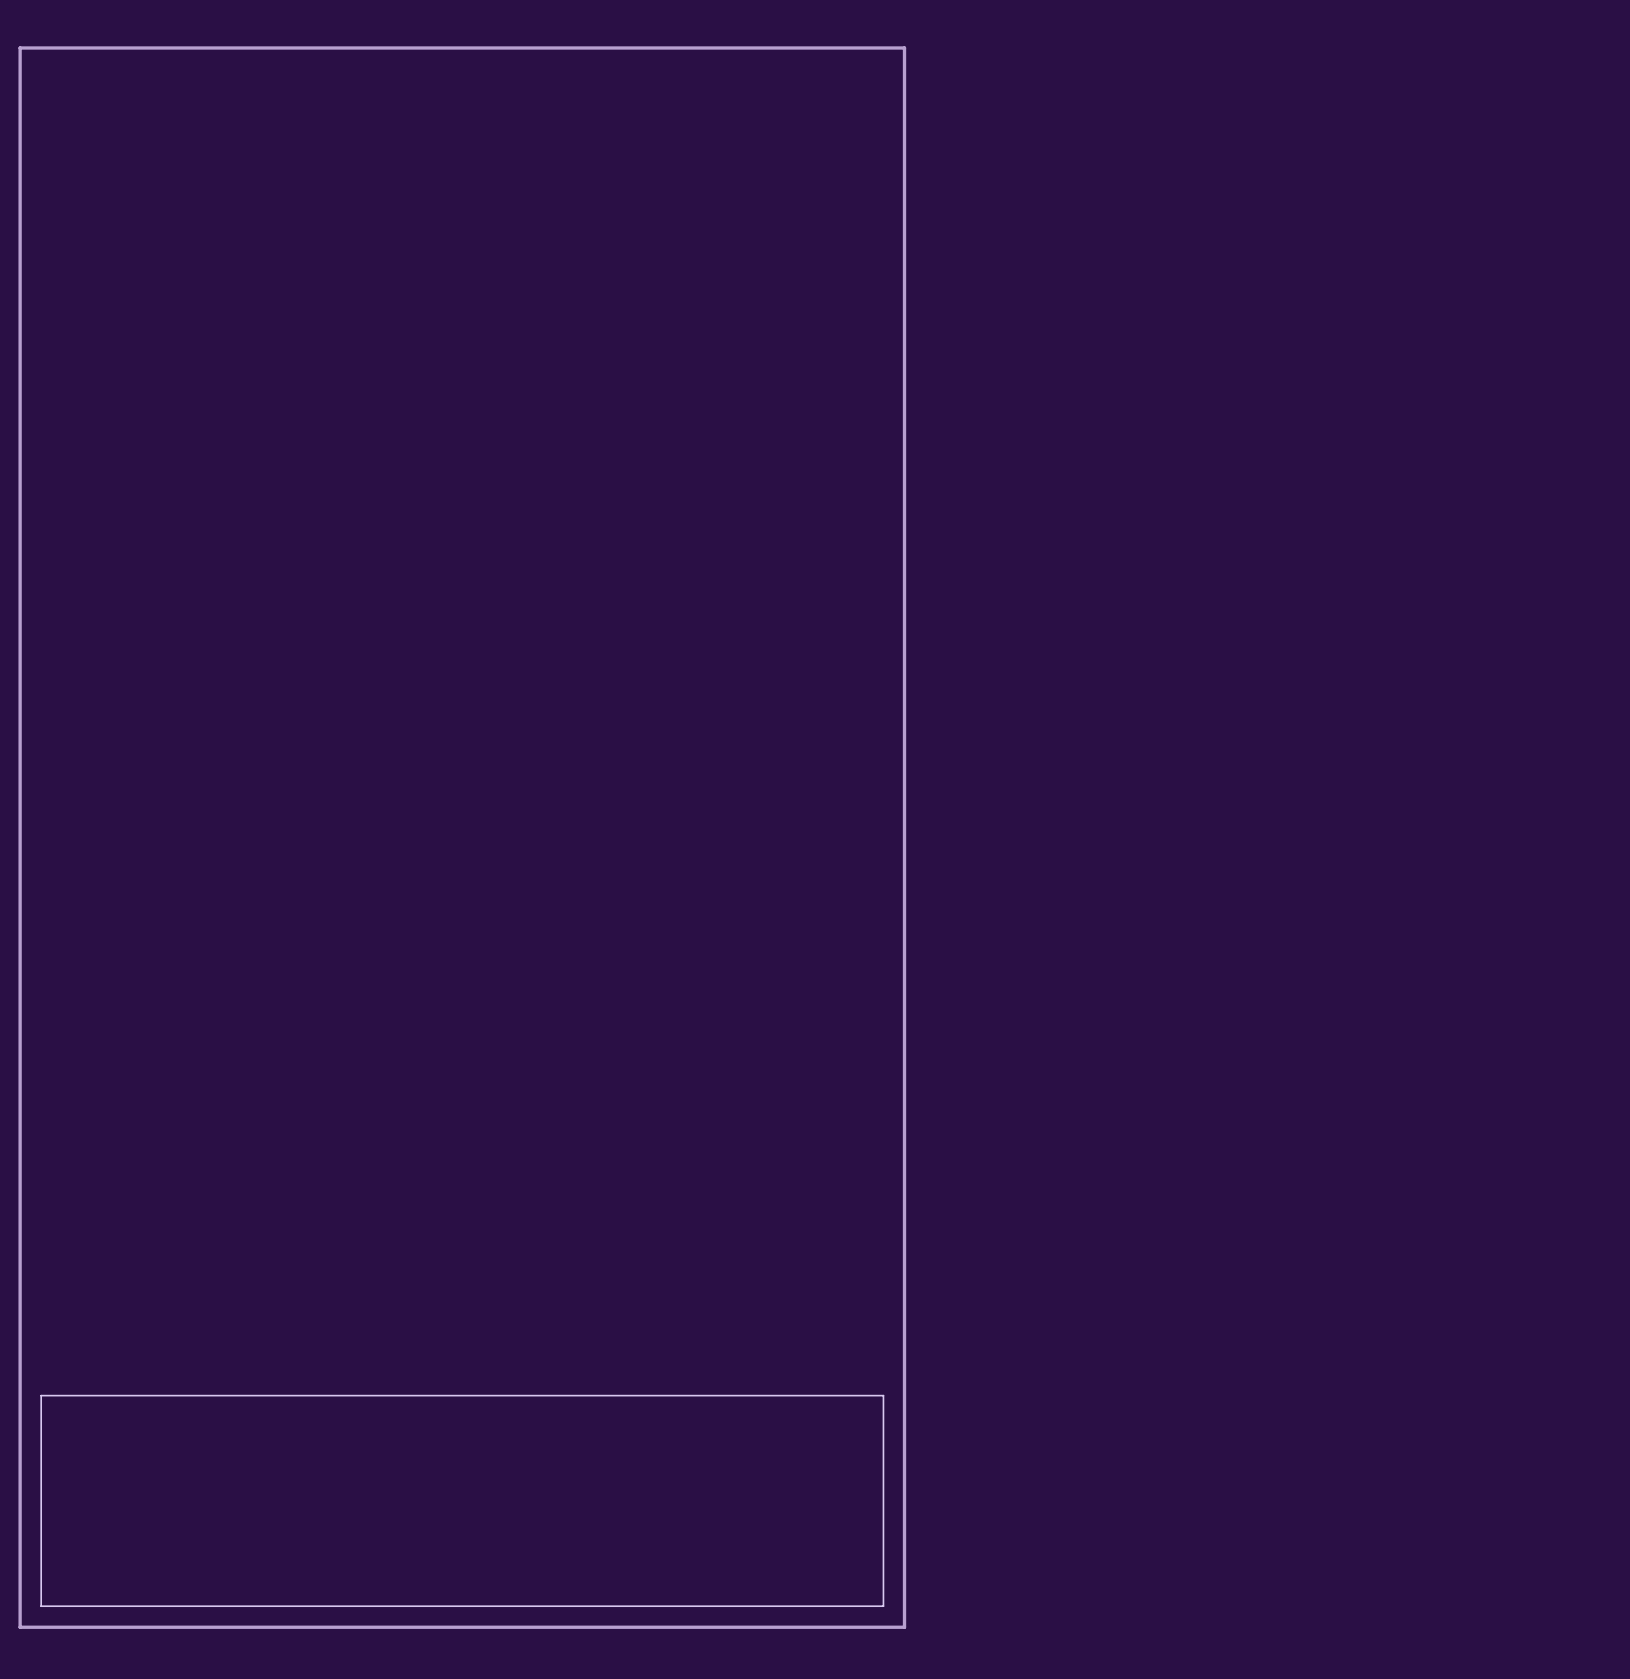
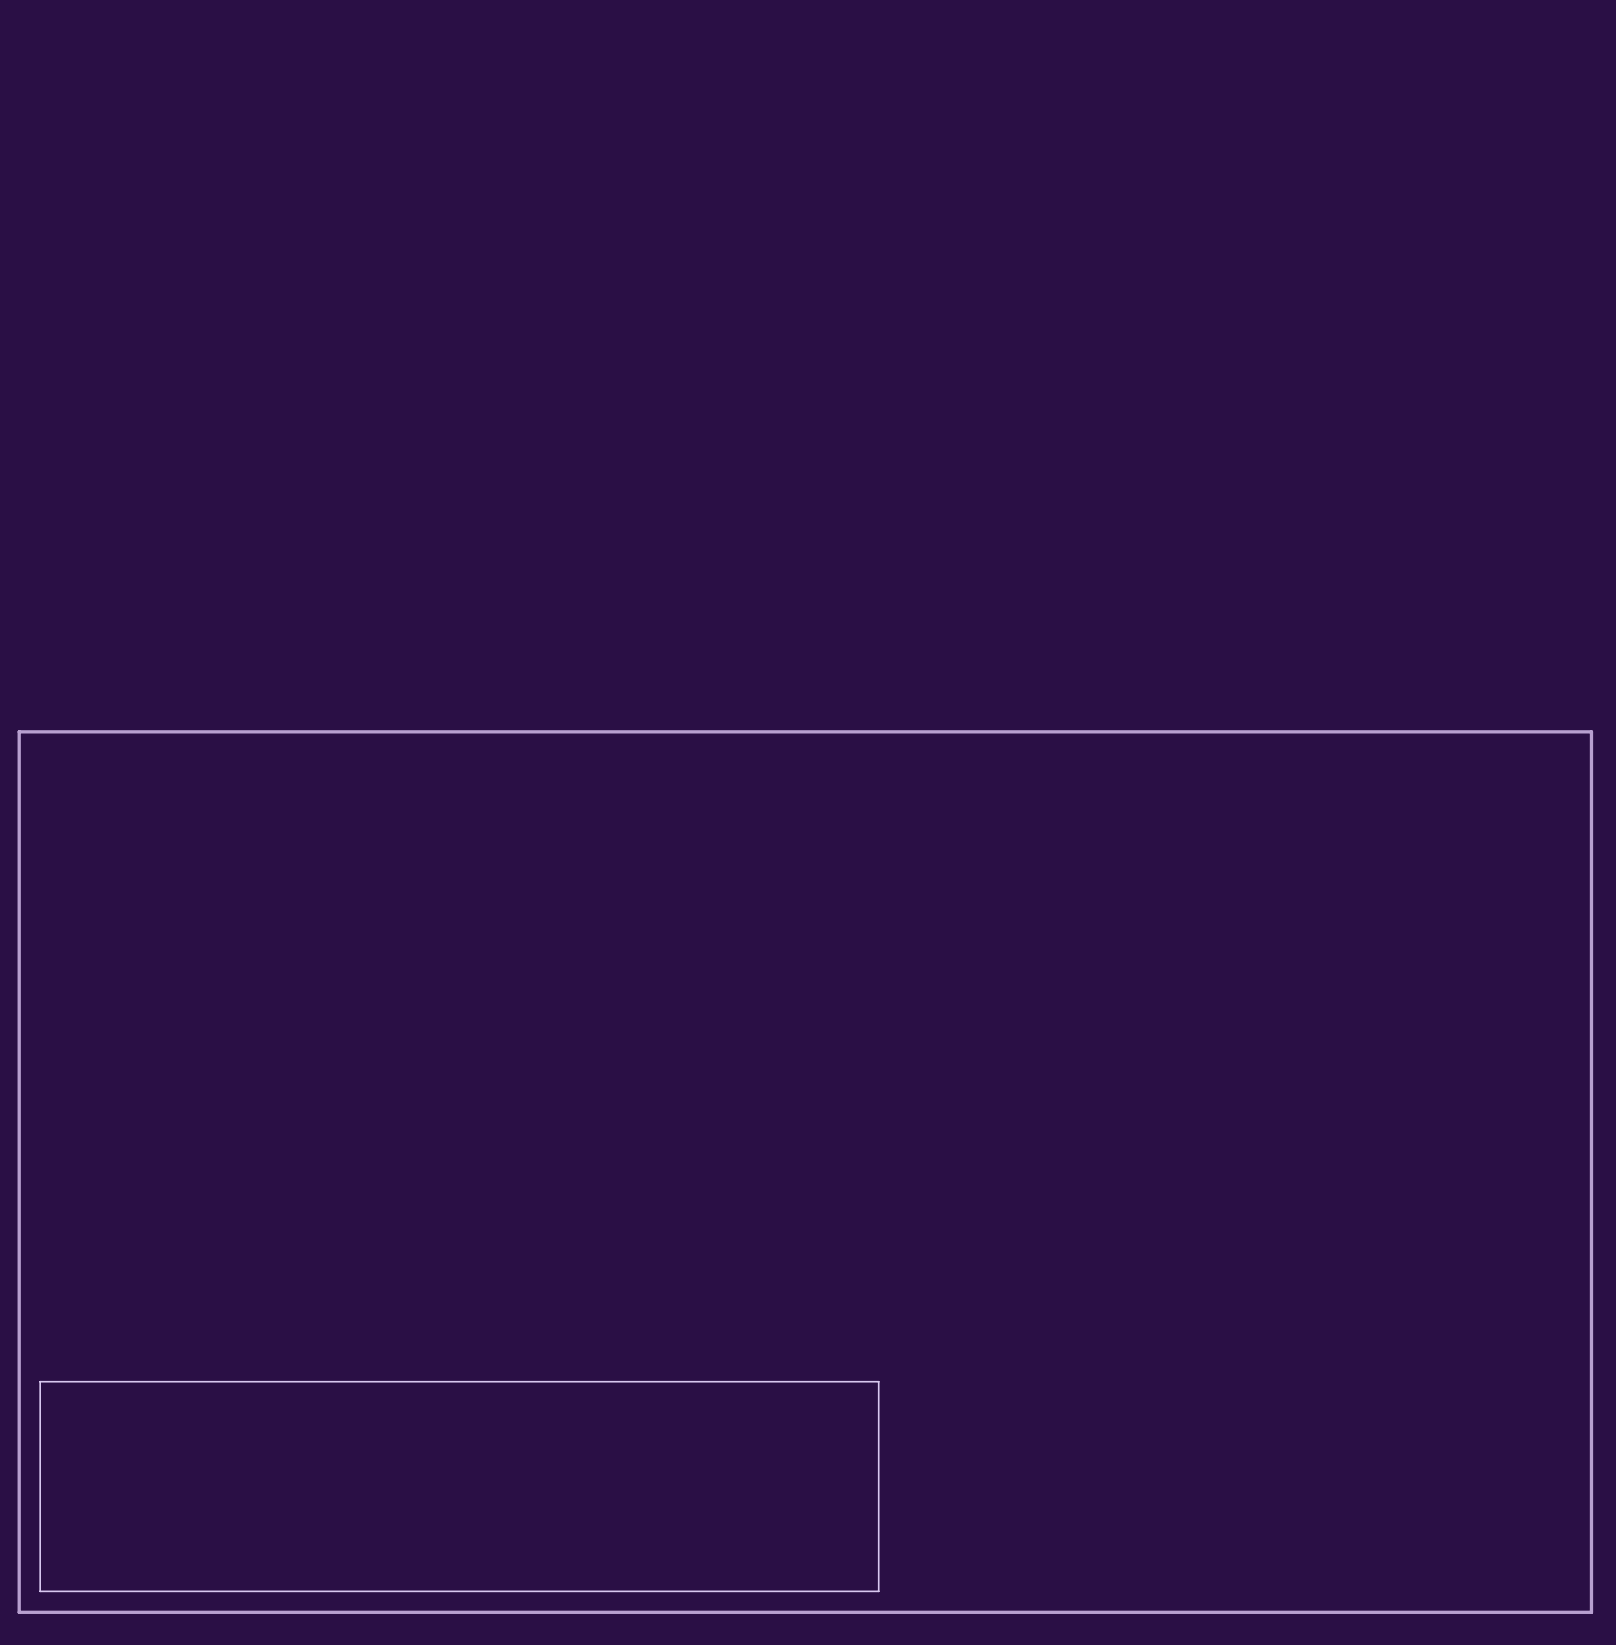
line: (20, 742) (20, 47) (904, 47) (904, 1627) -> (19, 731) (1591, 731) (1591, 1612) (899, 1612)

